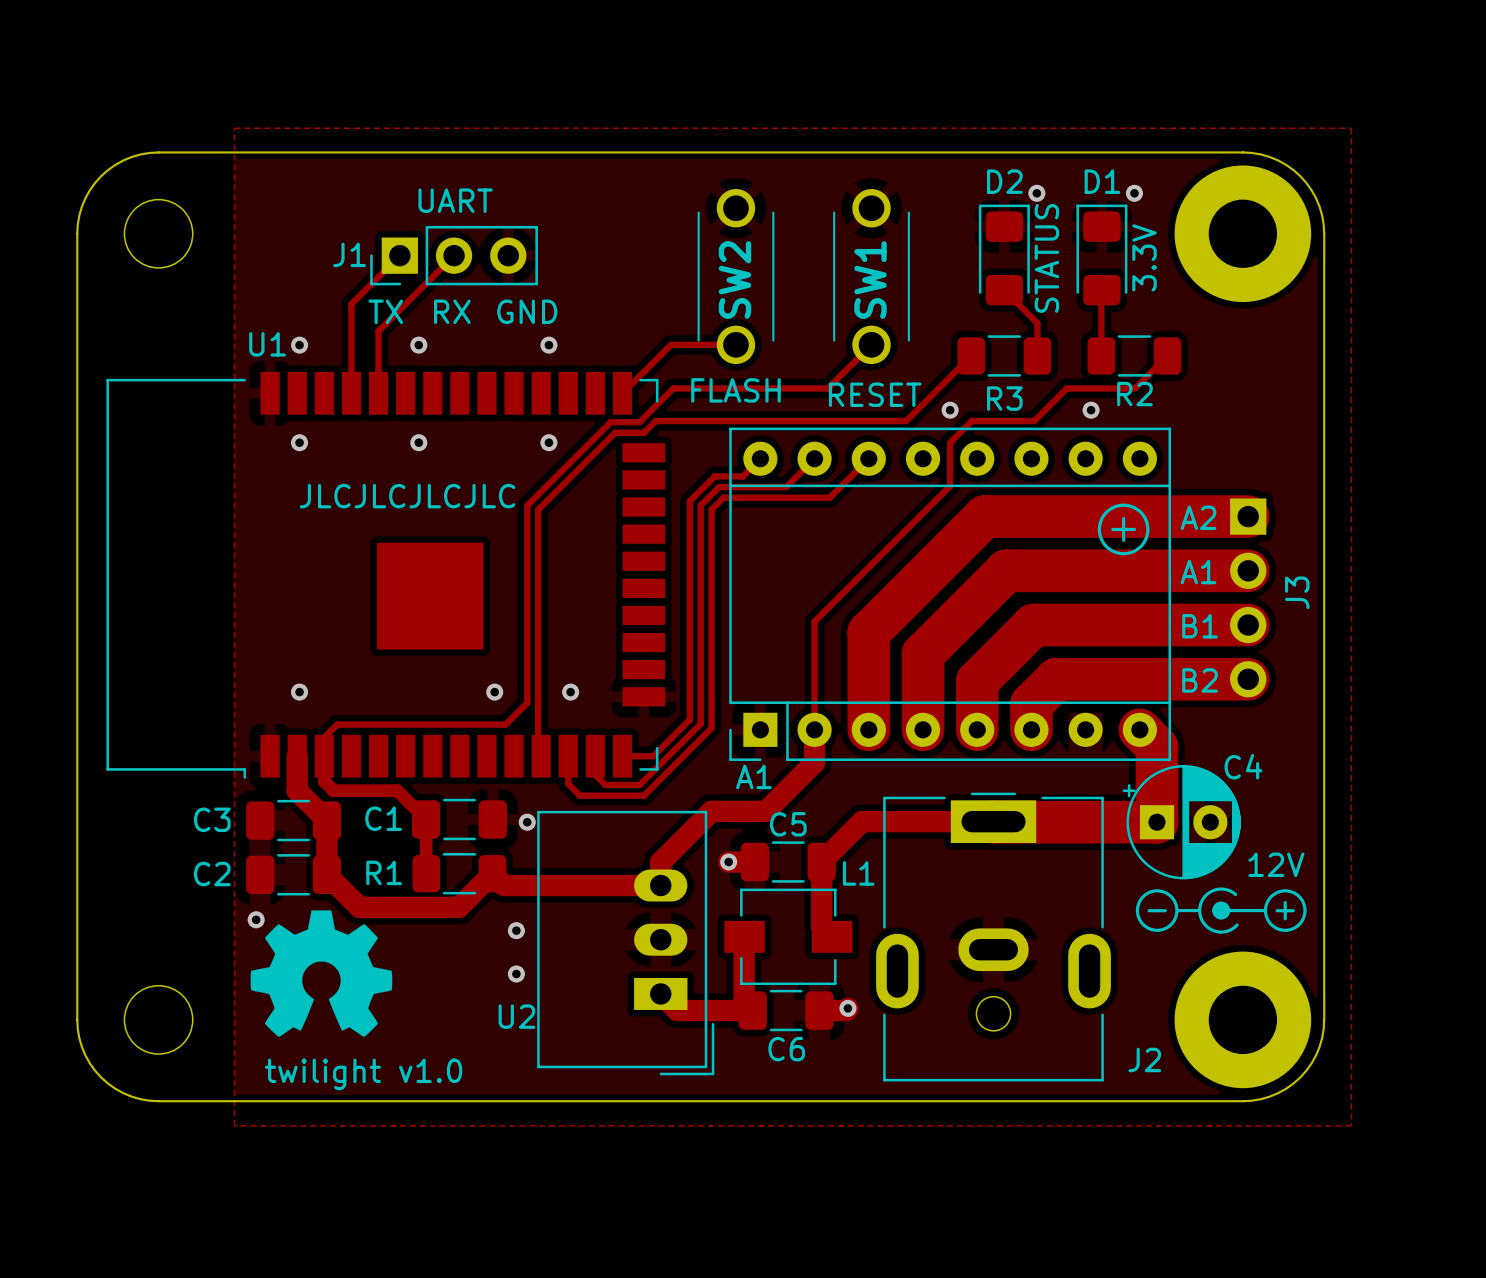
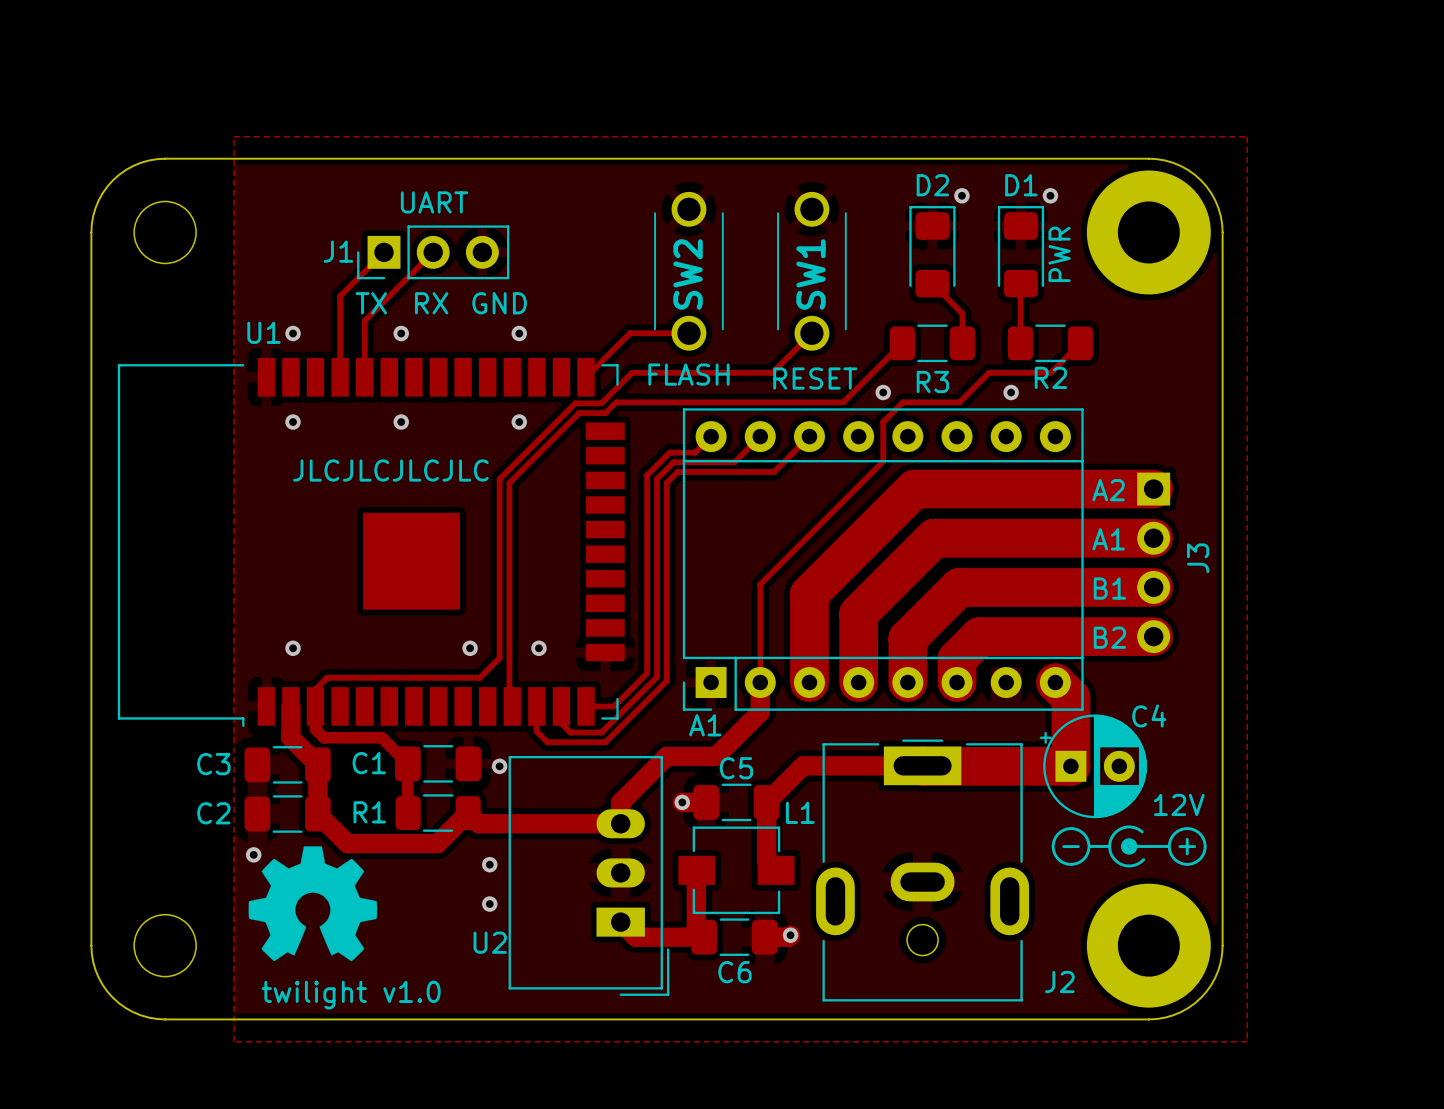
text: 3.3V (1144, 257) -> PWR (1059, 254)
text: STATUS (1046, 258) -> none
drawing: [1097, 503, 1150, 556] -> none
line: (1123, 518) (1123, 540) -> none
line: (1112, 529) (1134, 529) -> none

